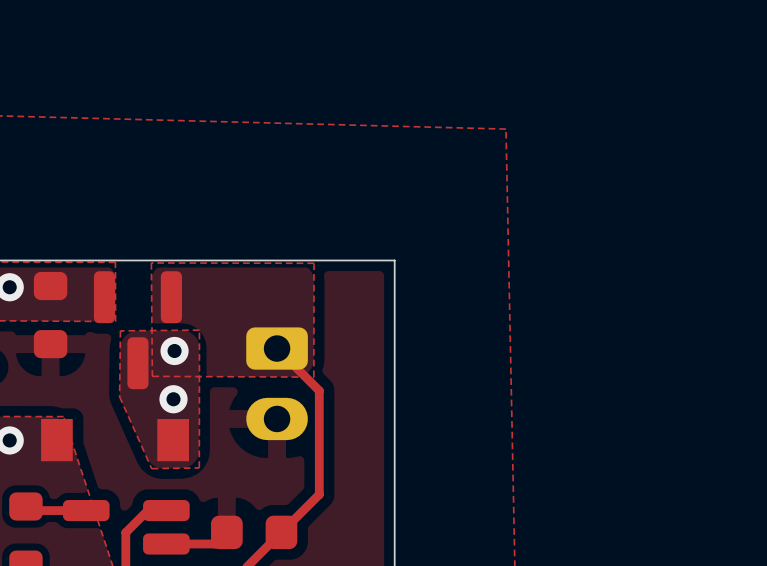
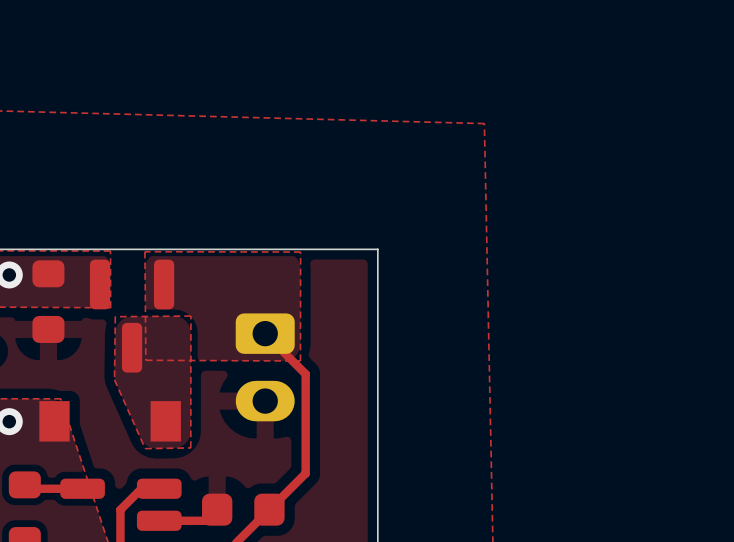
via: (174, 350) -> none
via: (173, 399) -> none

